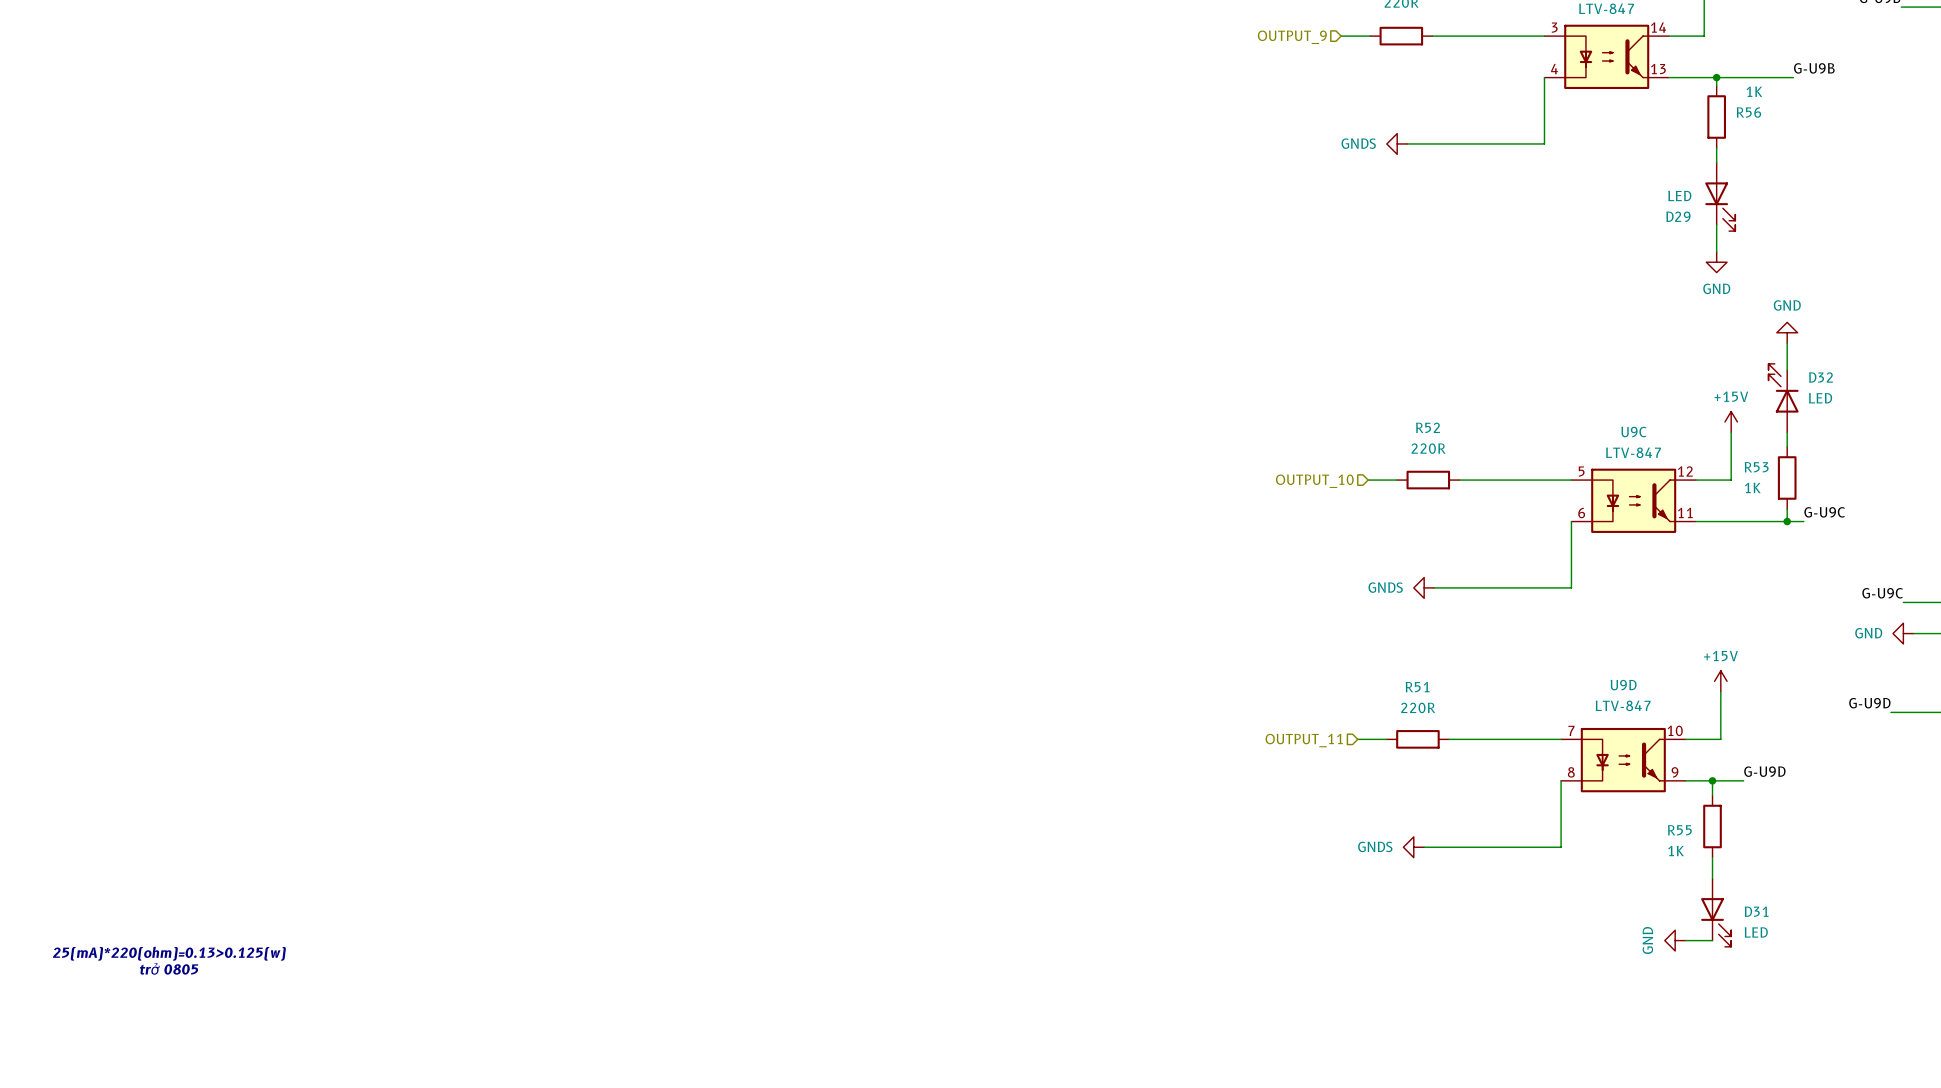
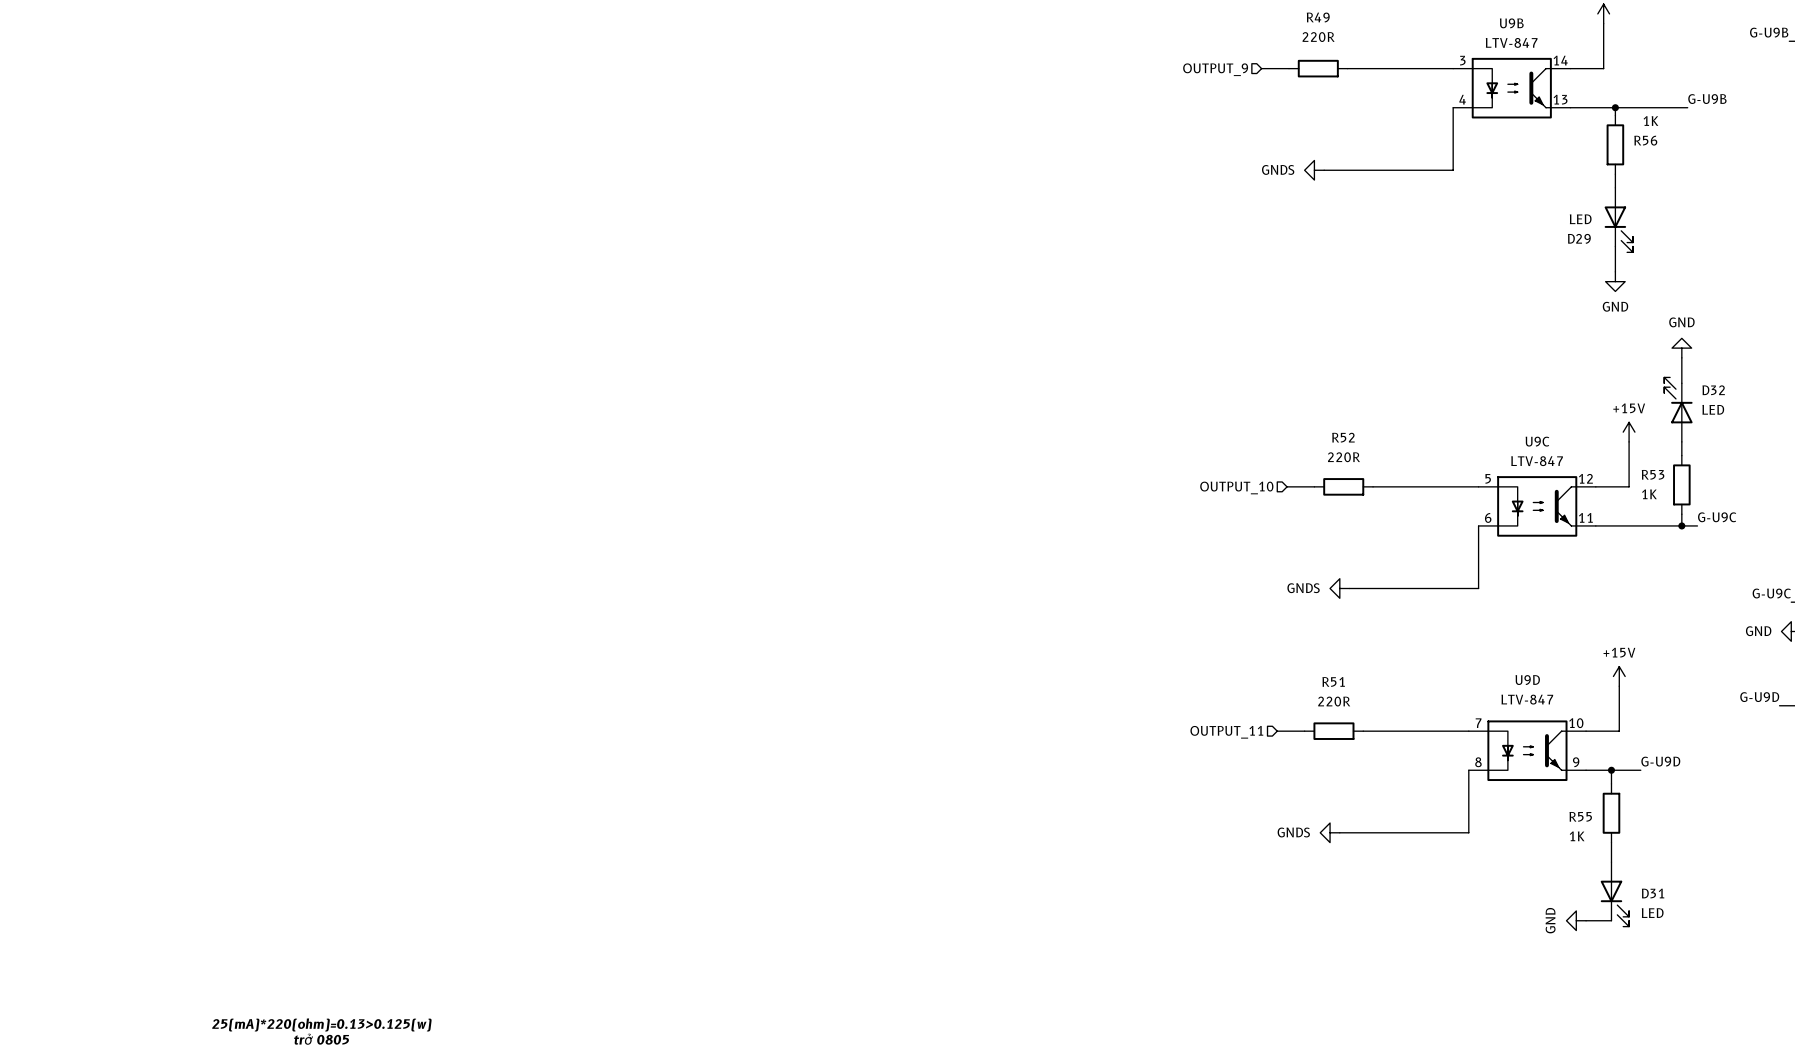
text position: 25(mA)*220(ohm)=0.13>0.125(w) (169, 953) -> 25(mA)*220(ohm)=0.13>0.125(w) (321, 1024)
text position: trở 0805 (169, 968) -> trở 0805 (321, 1039)

